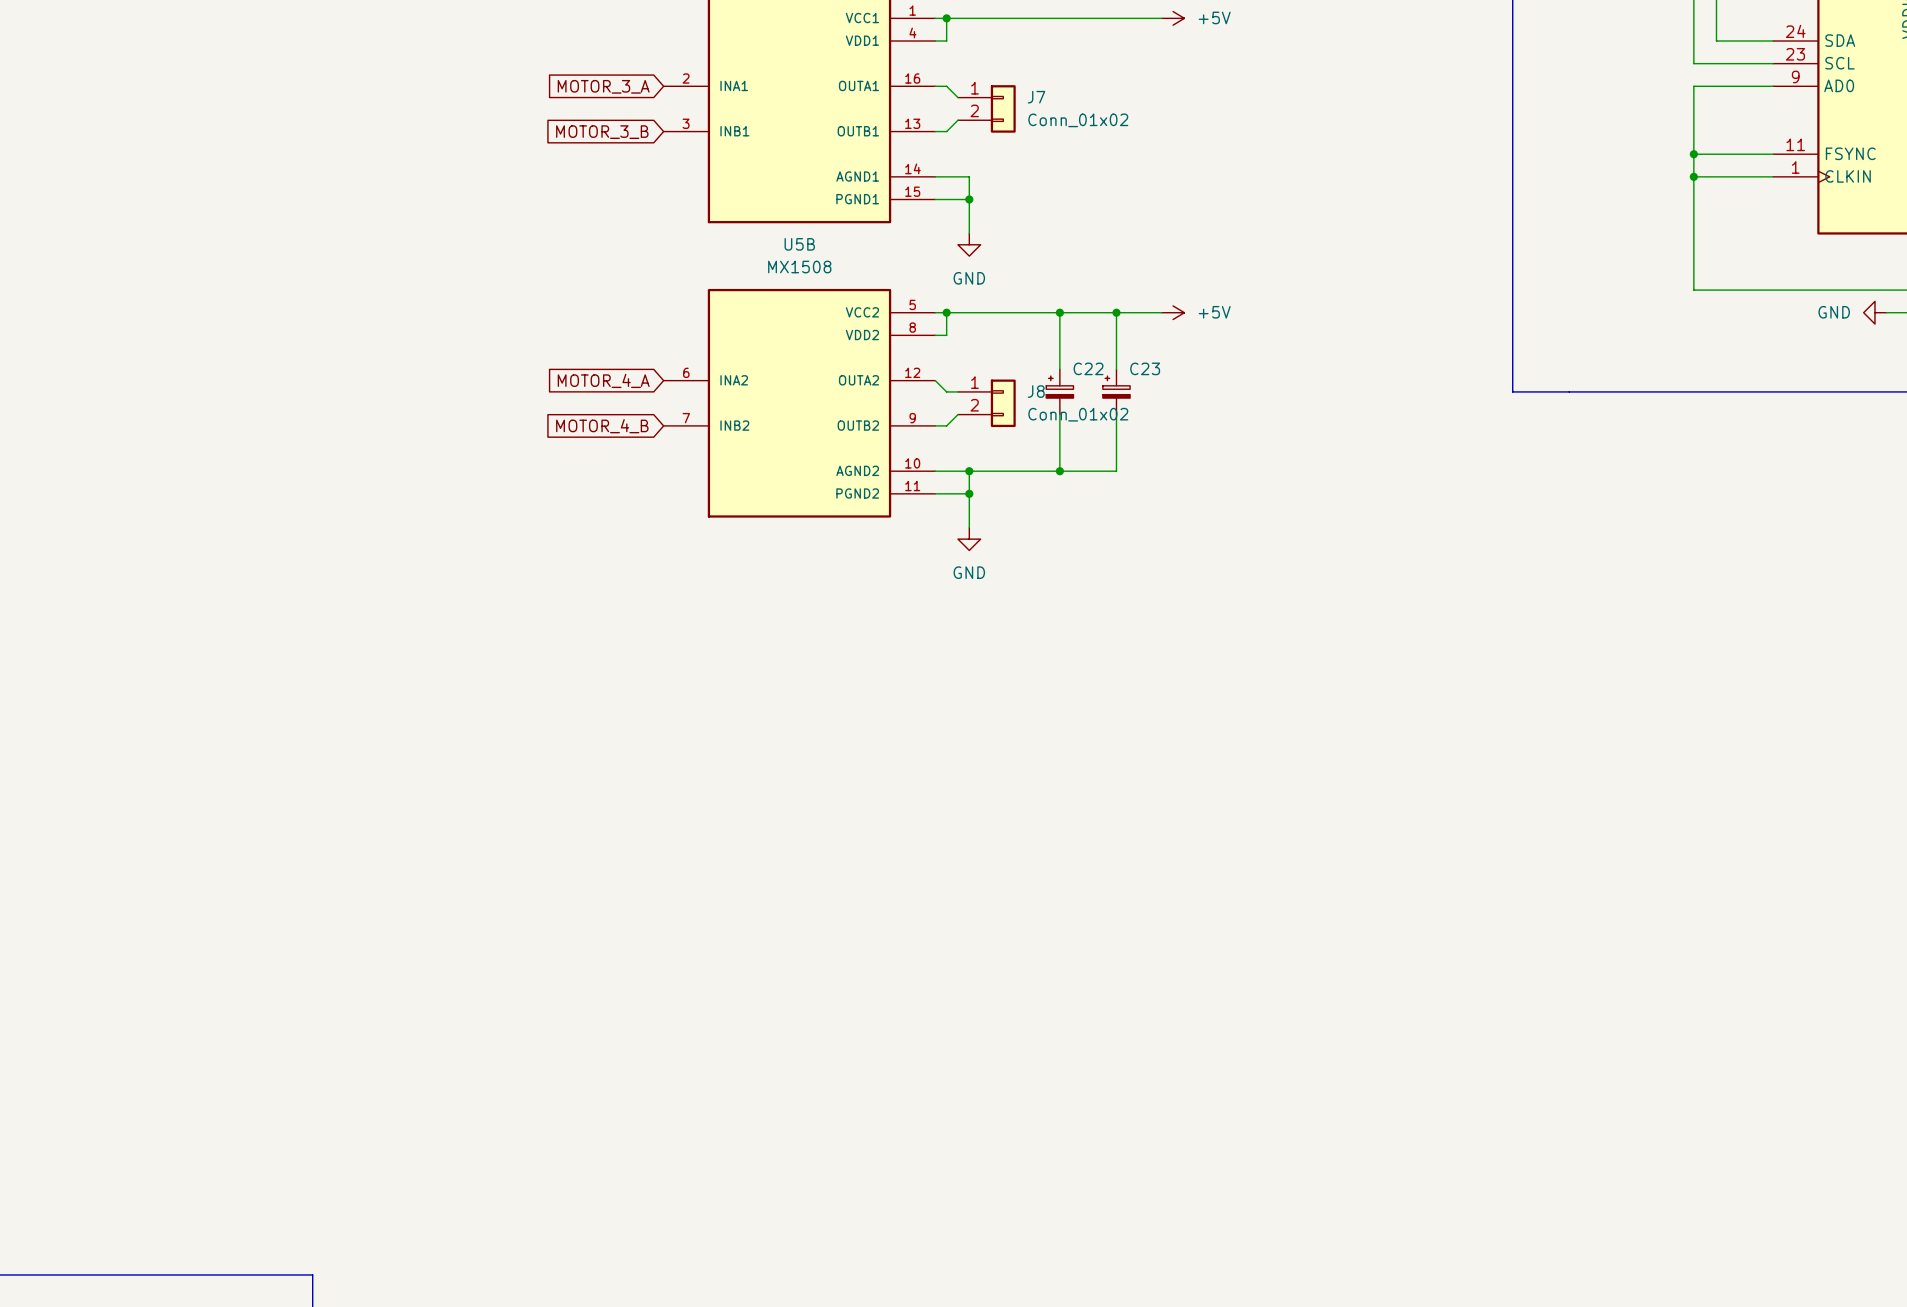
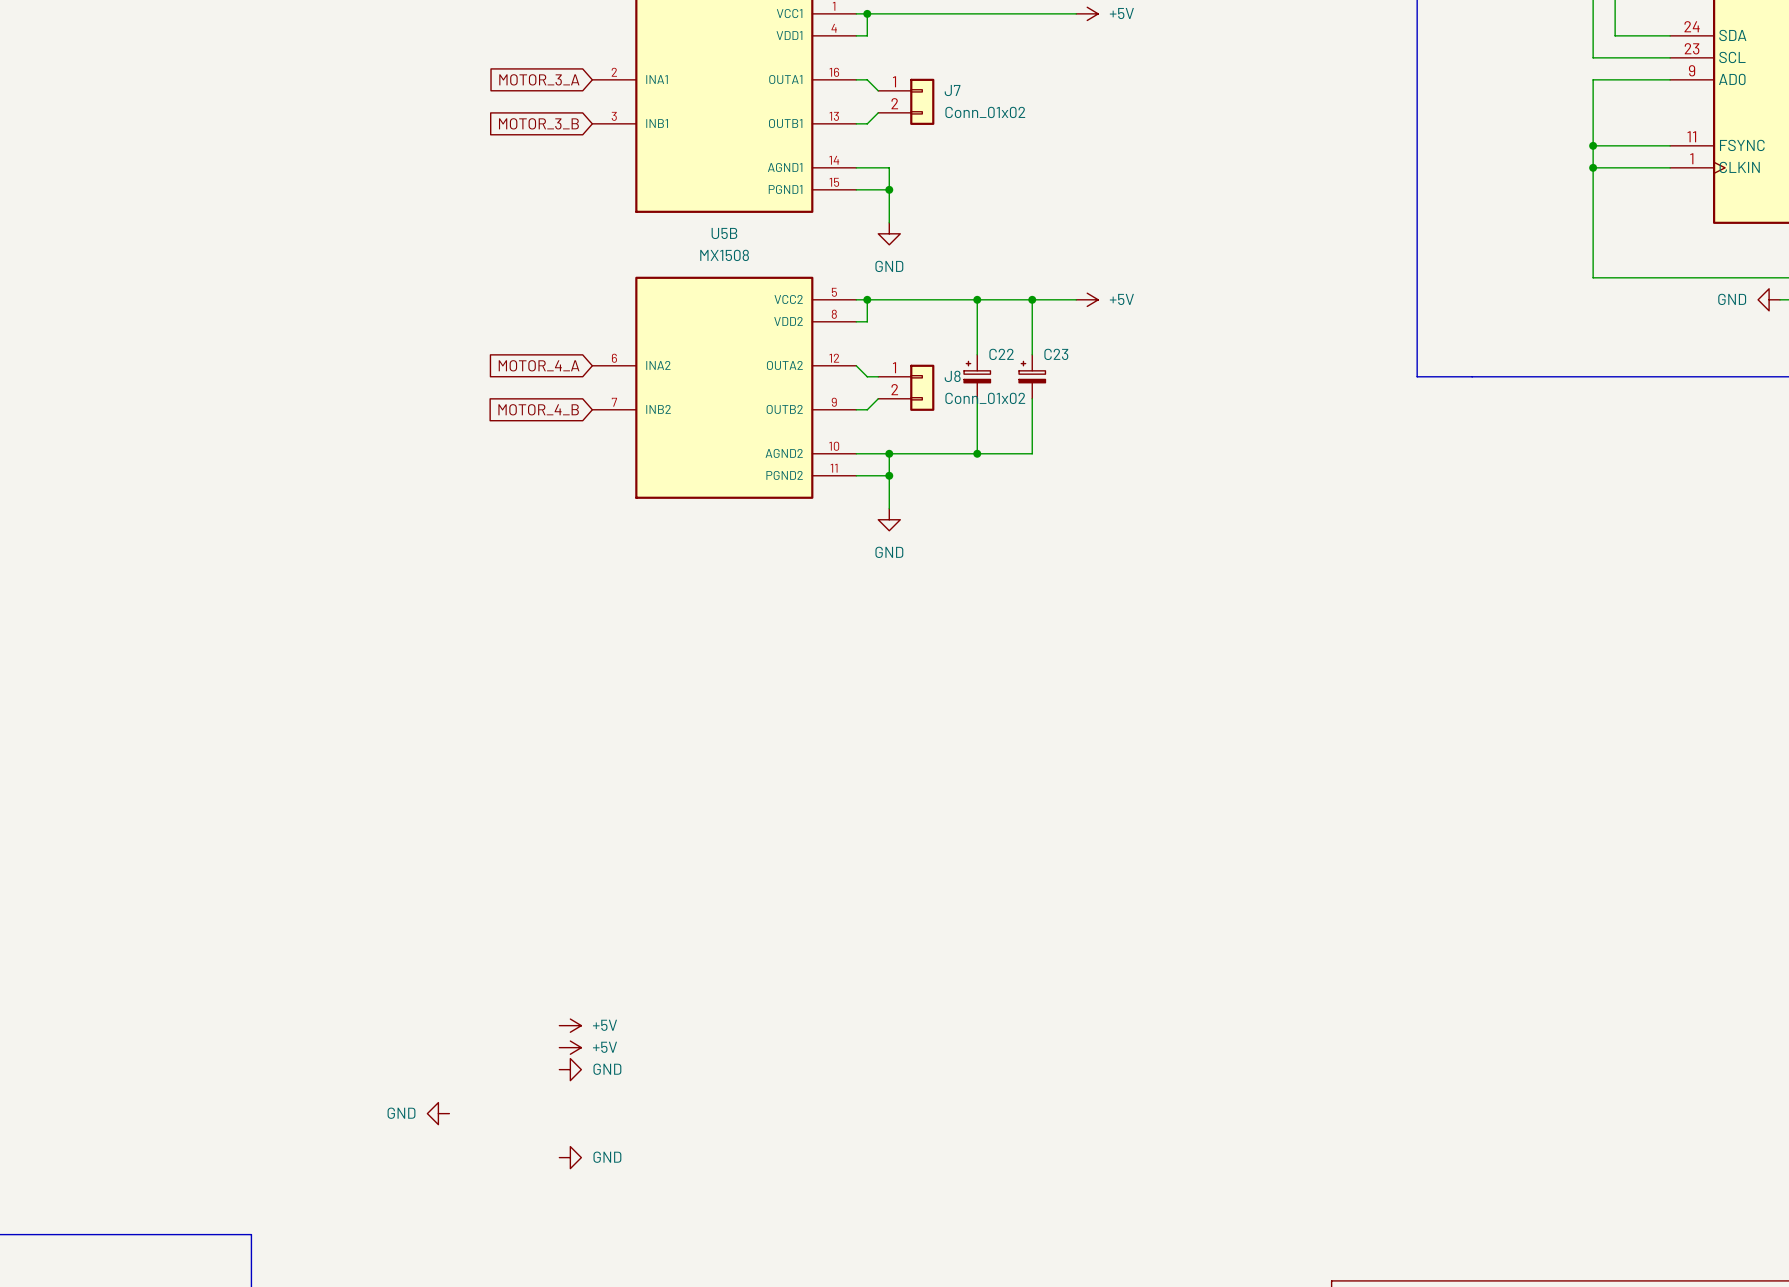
power symbol: none -> +5V (570, 1025)
power symbol: none -> +5V (570, 1047)
power symbol: none -> GND (570, 1069)
power symbol: none -> GND (438, 1113)
power symbol: none -> GND (570, 1157)

